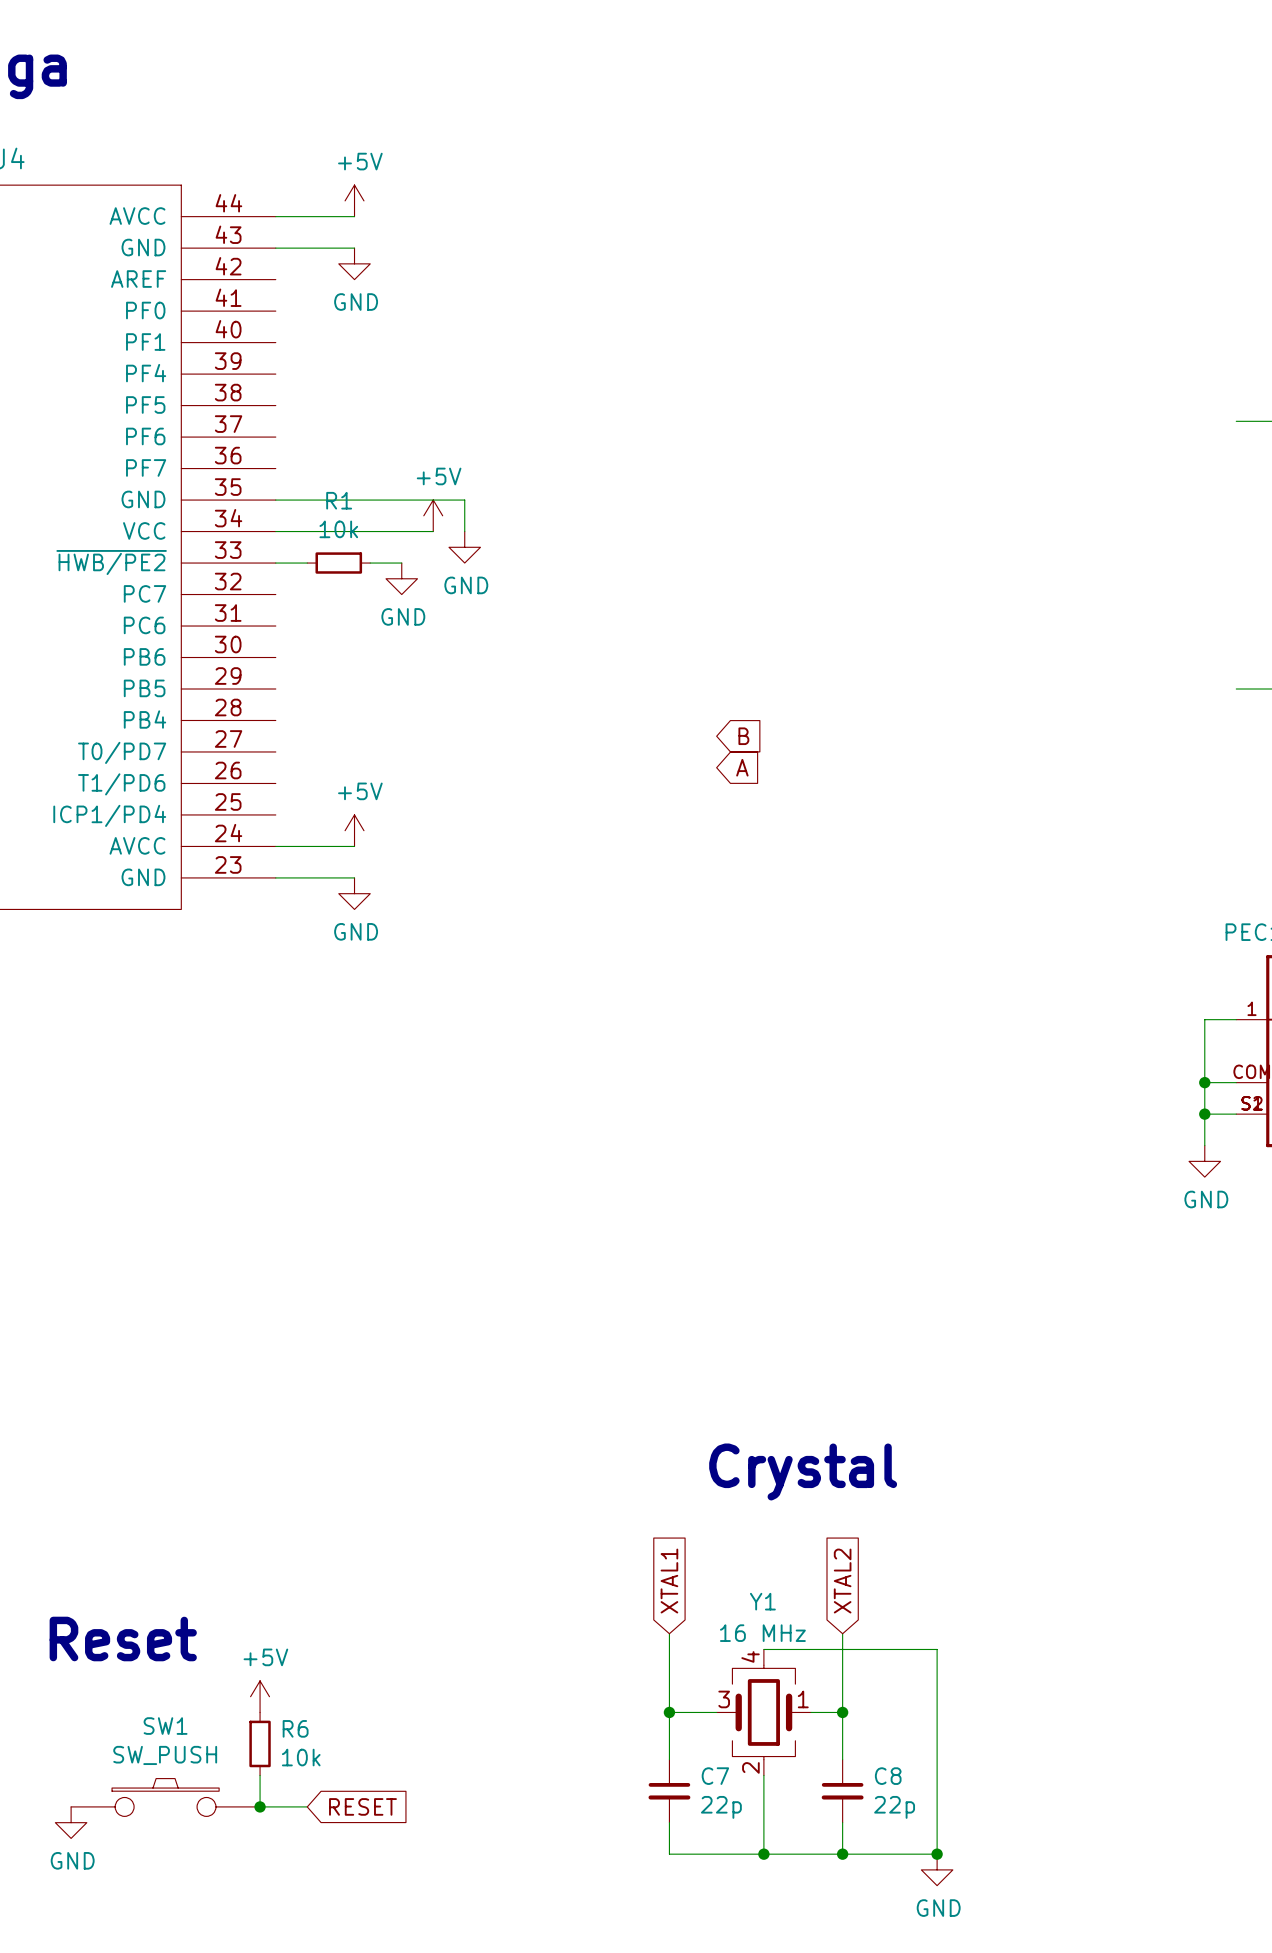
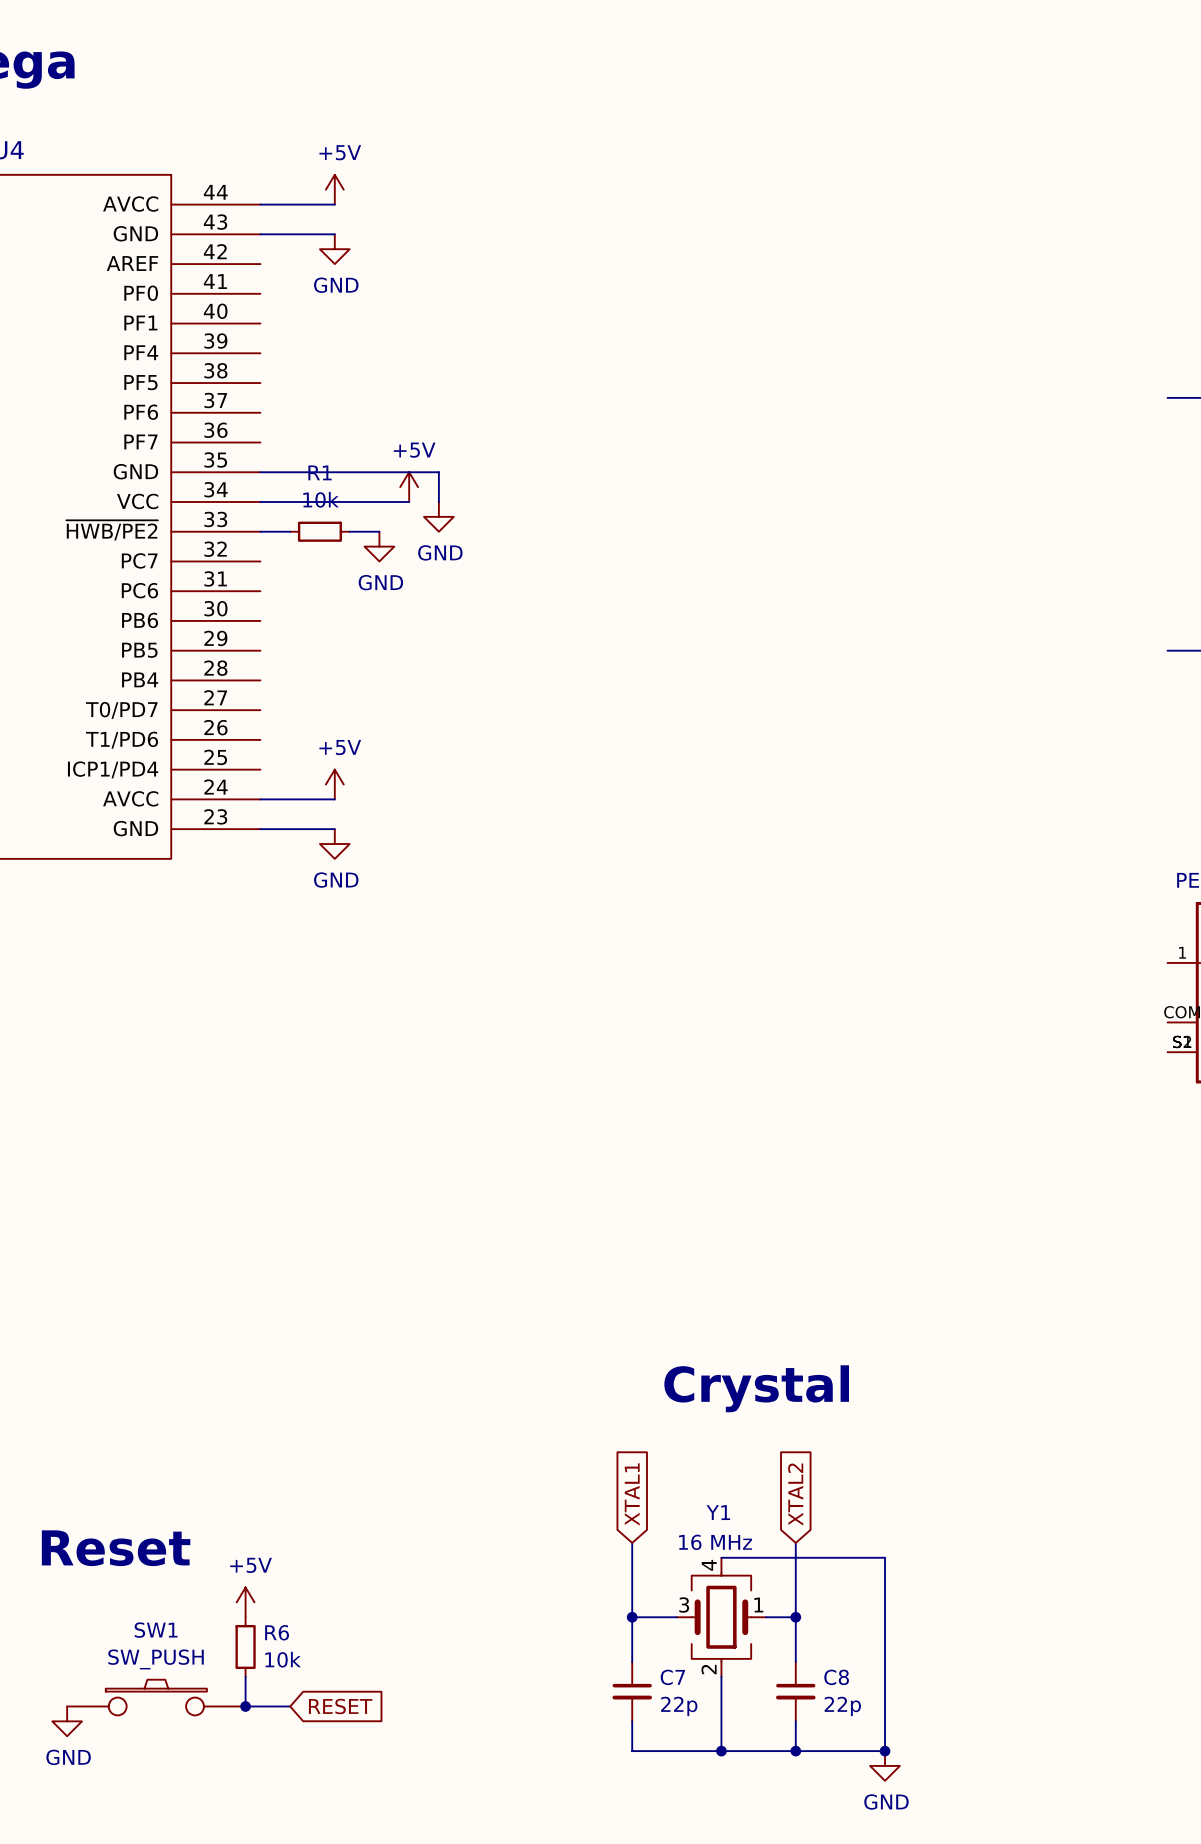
global label: B (743, 736) -> none
global label: A (742, 767) -> none
wire: (1236, 1019) (1204, 1019) (1204, 1145) -> none
wire: (1204, 1082) (1236, 1082) -> none
junction: (1204, 1082) -> none
wire: (1204, 1114) (1236, 1114) -> none
junction: (1204, 1114) -> none
power symbol: GND (1204, 1161) -> none

